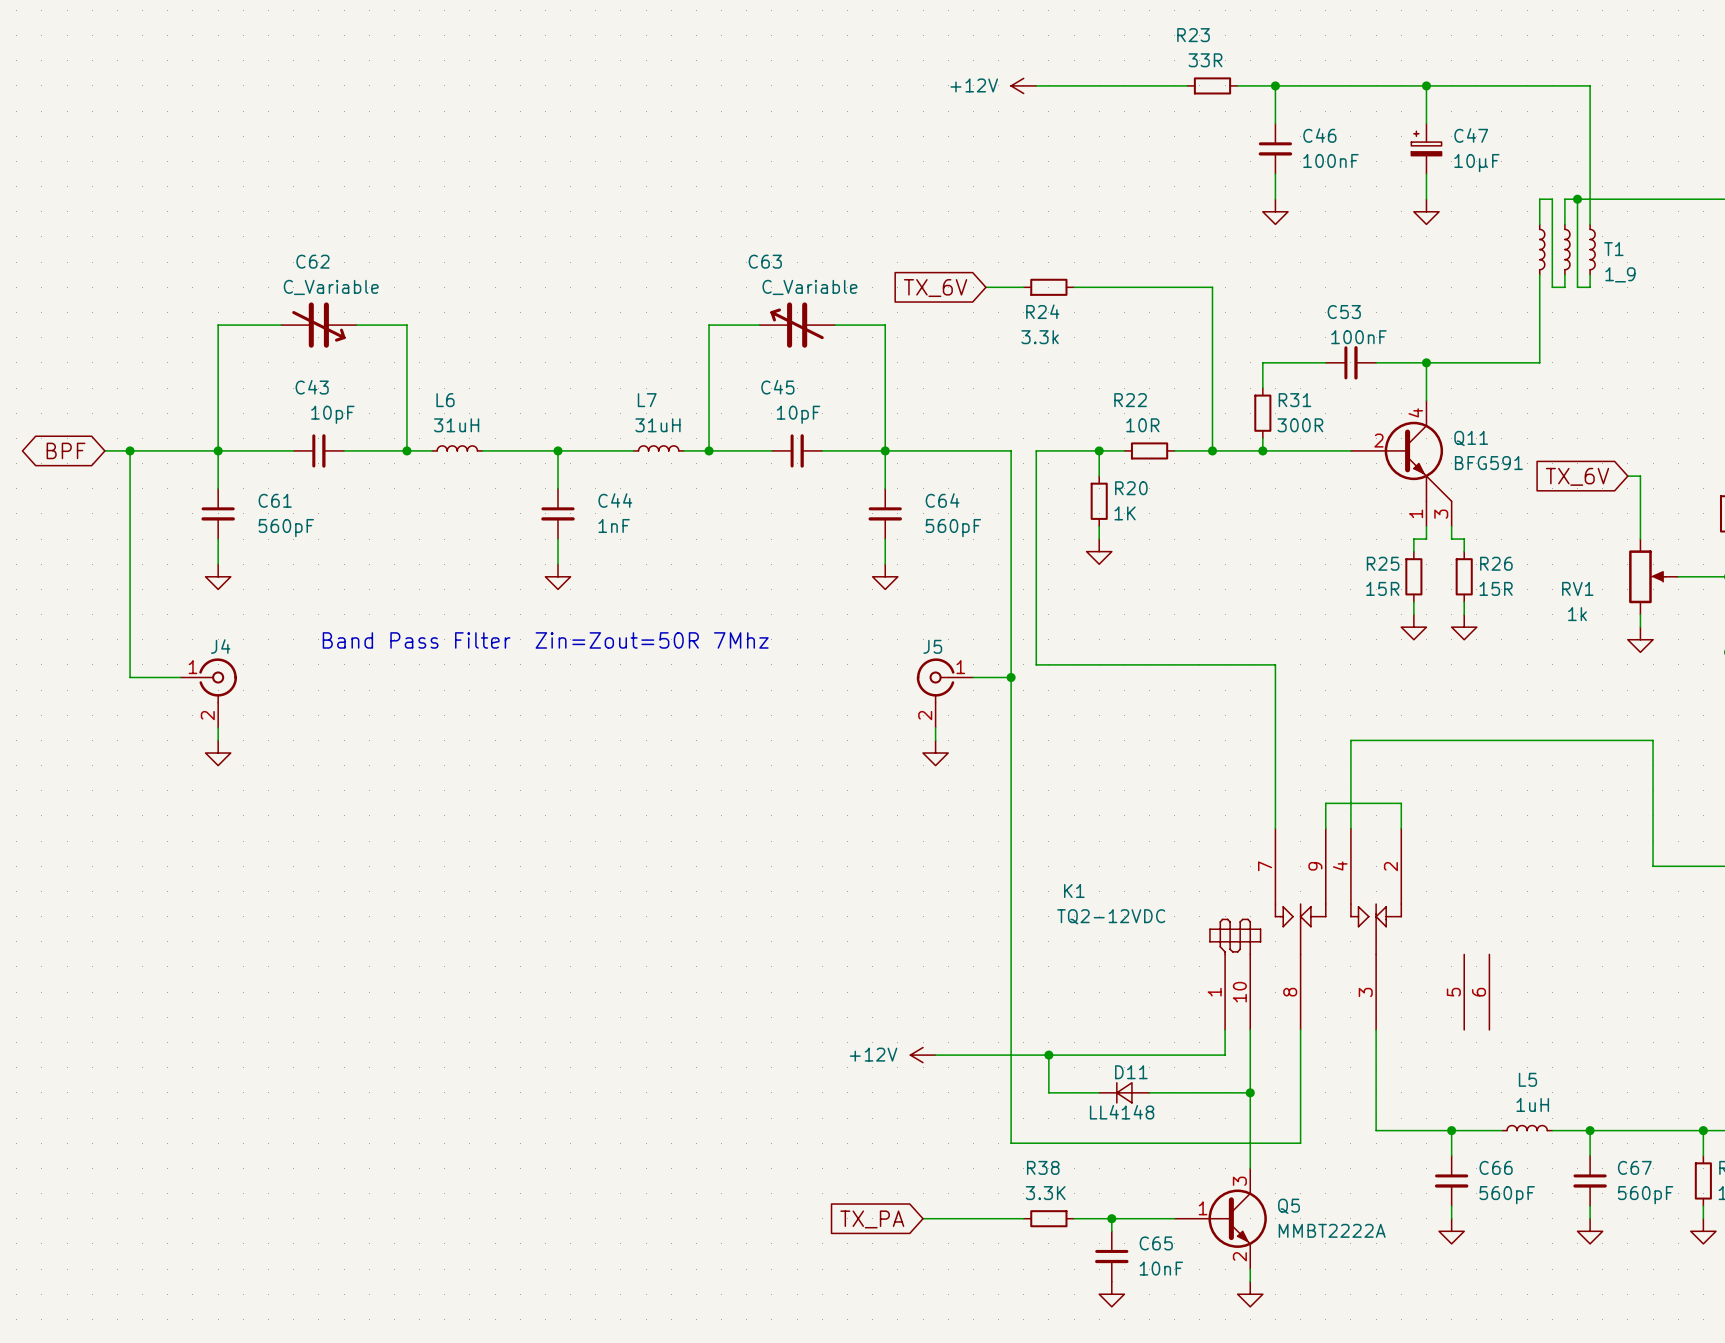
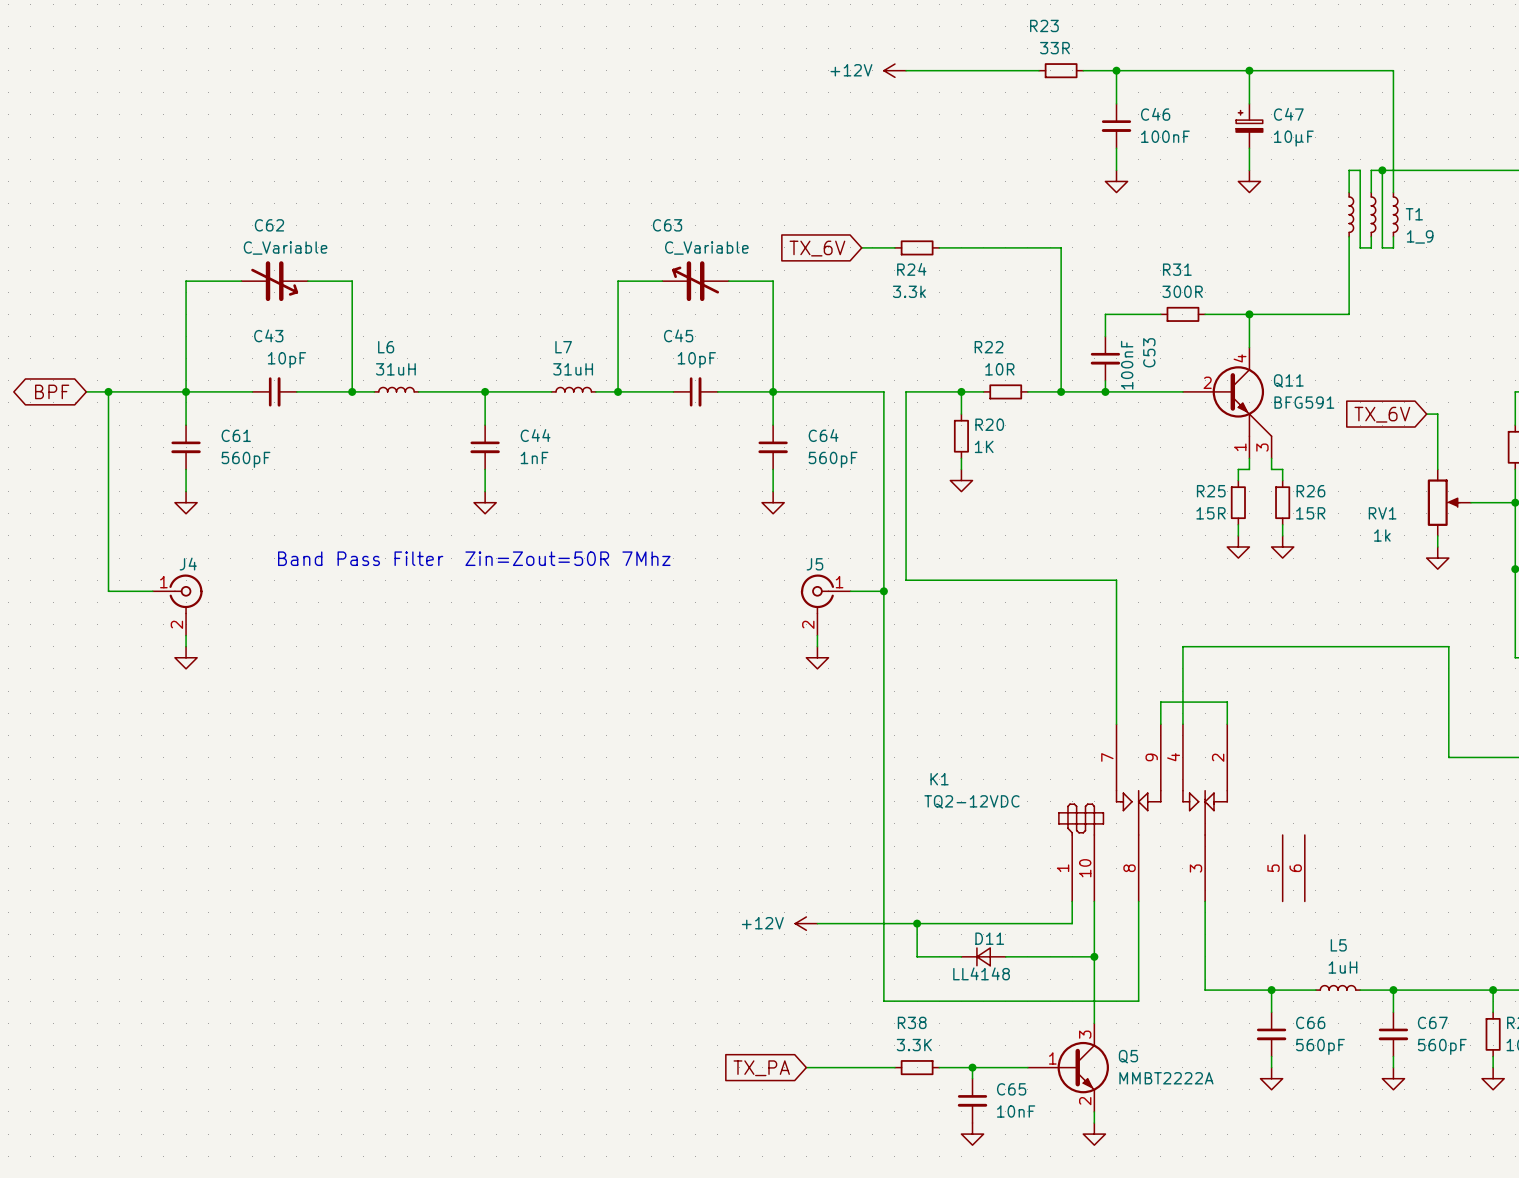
C53 position: (1350, 362) -> (1105, 358)
C53 rotation: 0° (1351, 362) -> 90° clockwise (1105, 358)
R31 name position: R31 (1294, 400) -> R31 (1177, 269)
R31 rotation: 0° (1262, 413) -> 90° clockwise (1182, 314)
R31 position: (1262, 413) -> (1182, 314)
R31 value position: 300R (1300, 425) -> 300R (1182, 291)

